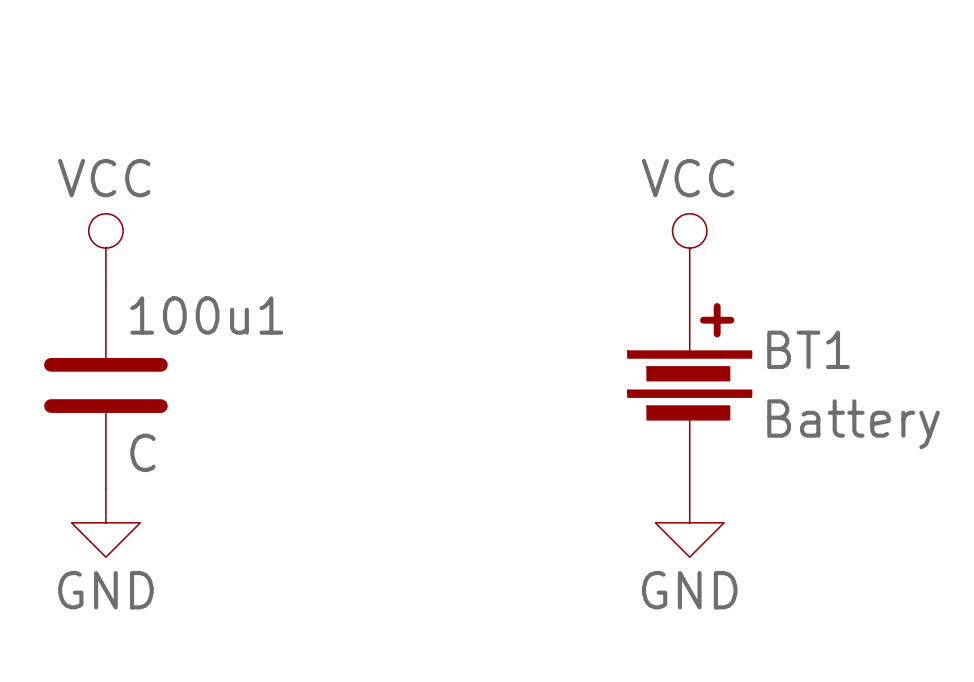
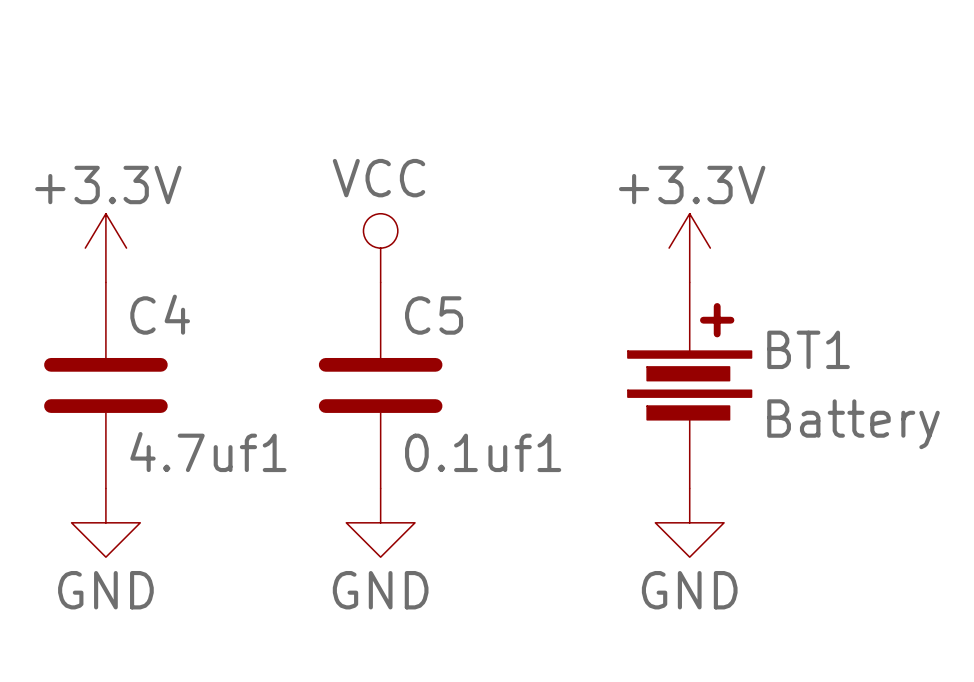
power symbol: VCC (105, 248) -> +3.3V (105, 248)
power symbol: none -> VCC (380, 248)
power symbol: VCC (689, 248) -> +3.3V (689, 248)
100u1 name: 100u1 (206, 315) -> C4 (160, 314)
C5: none -> 0.1uf1 (380, 385)
100u1 value: C (142, 452) -> 4.7uf1 (208, 452)
power symbol: none -> GND (380, 522)

